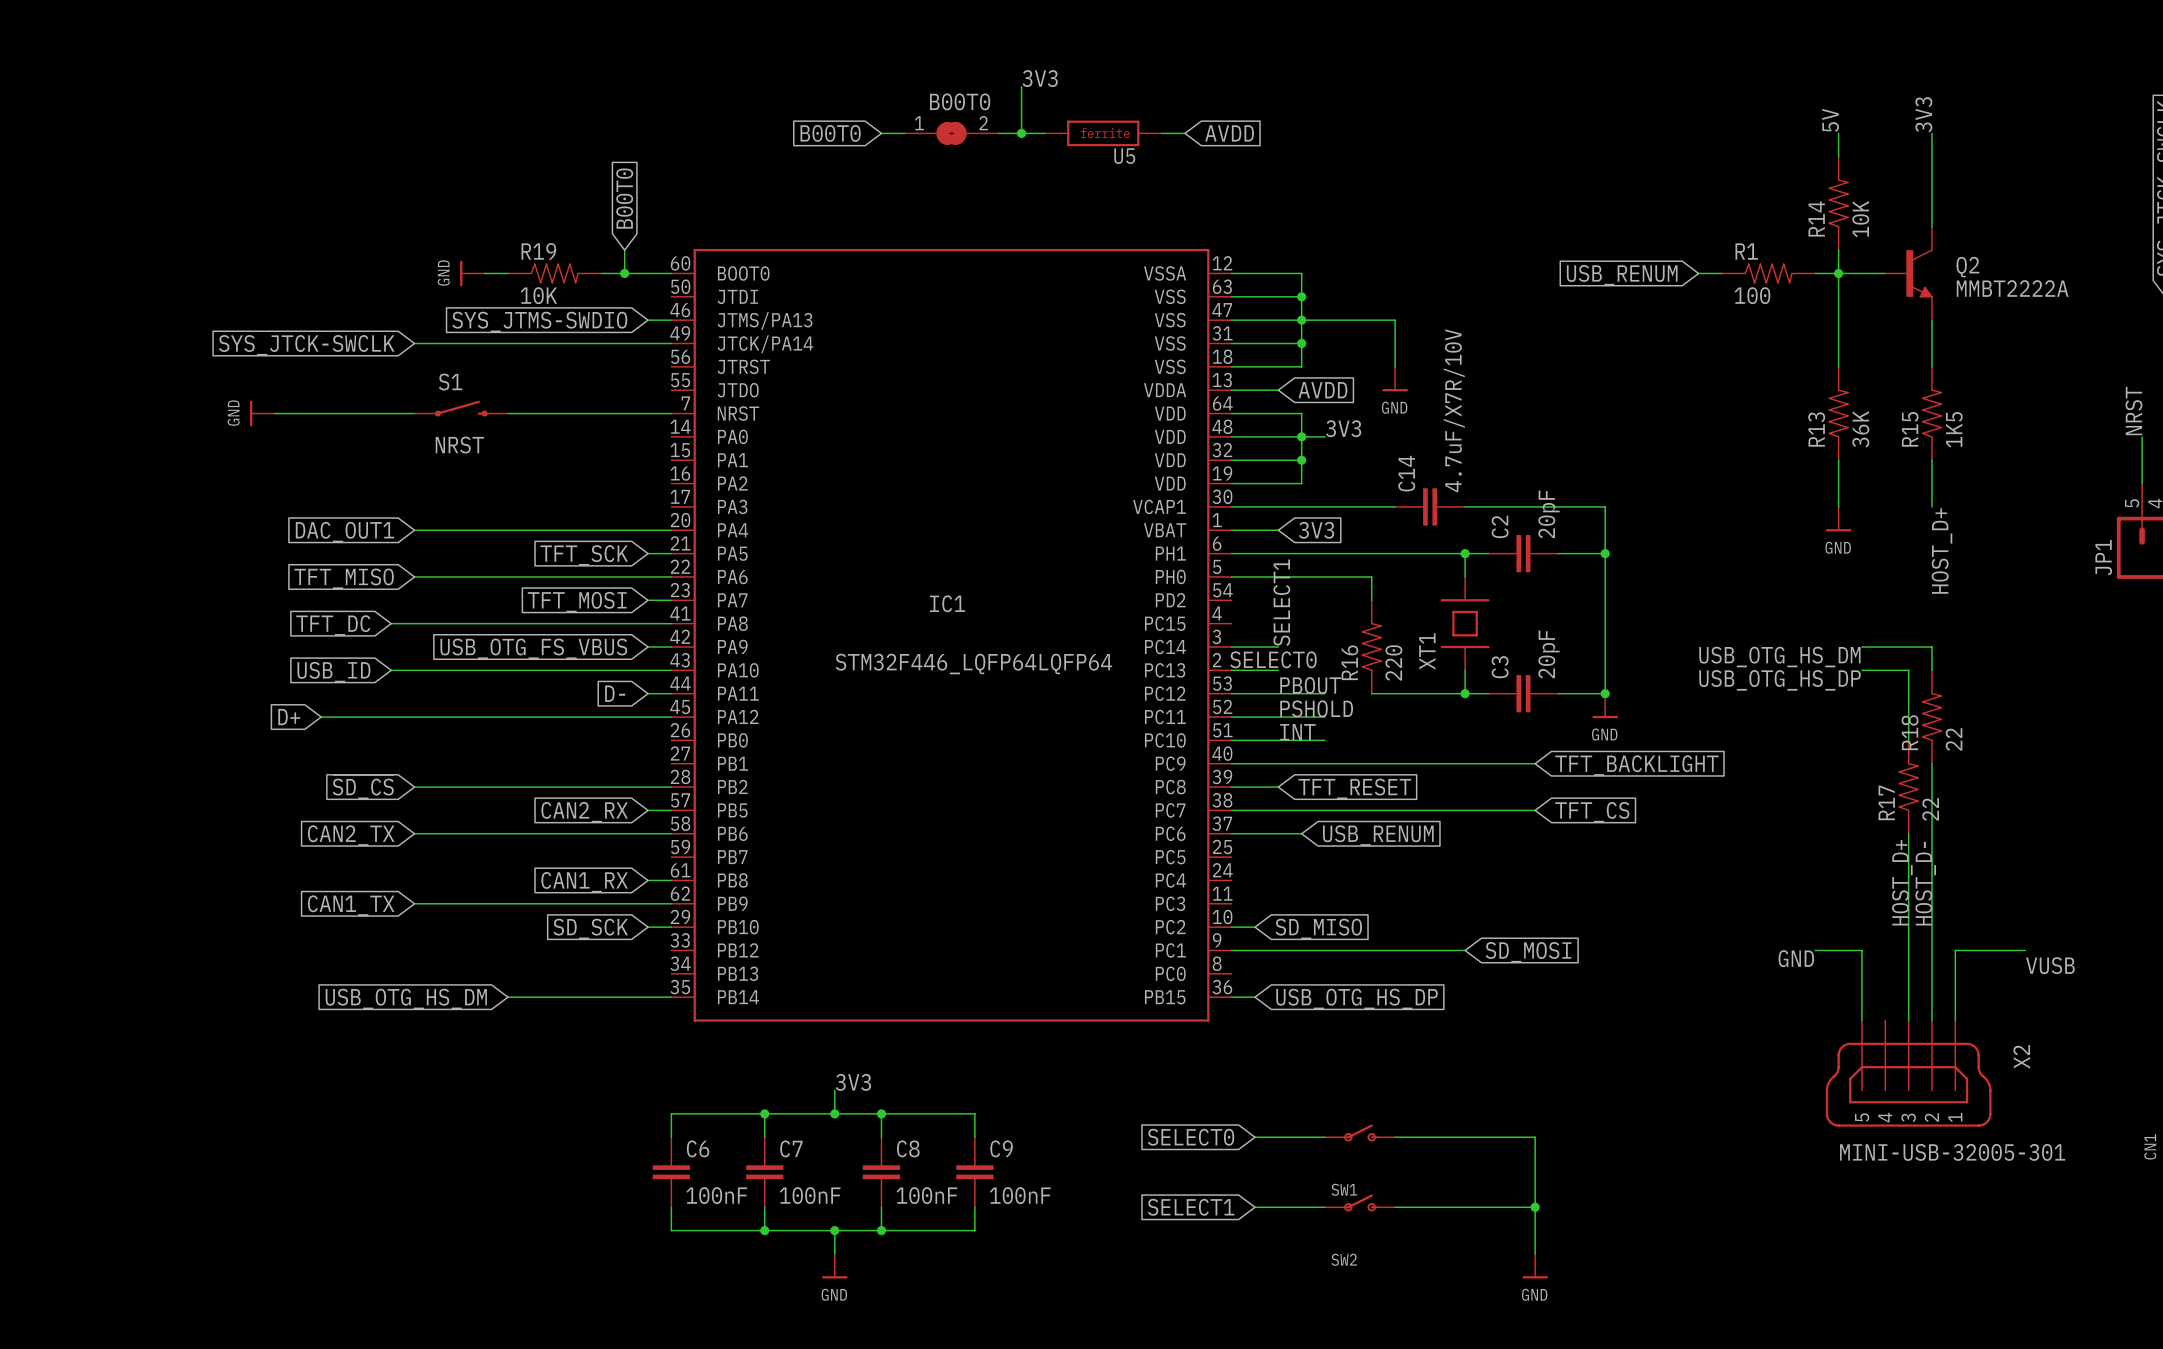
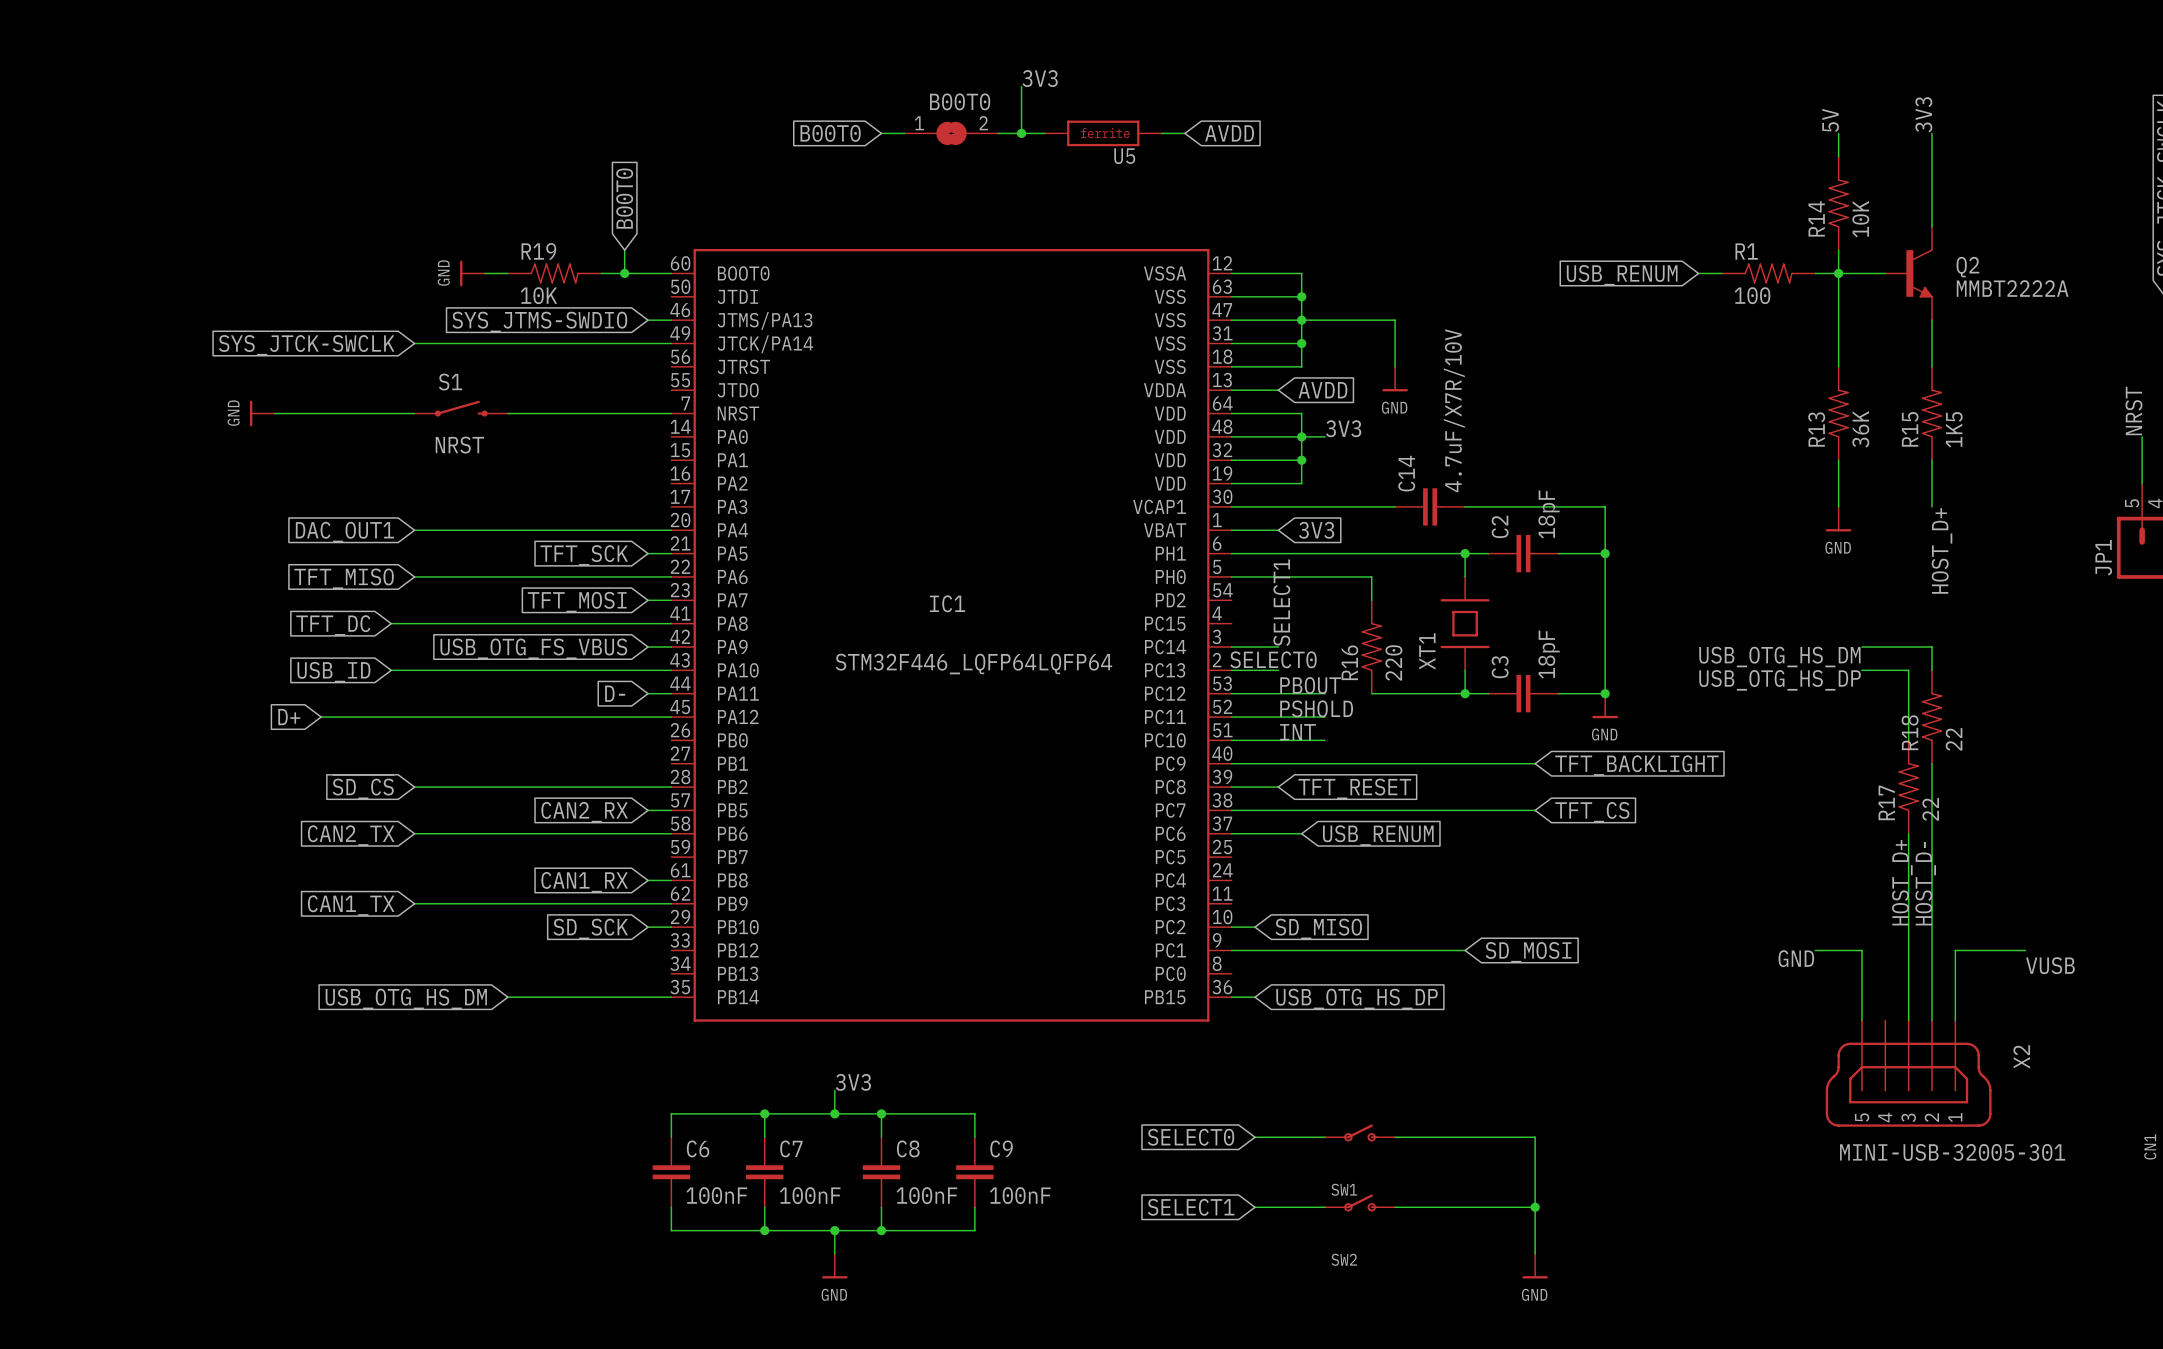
C2 value: 20pF (1549, 514) -> 18pF (1549, 514)
C3 value: 20pF (1549, 654) -> 18pF (1549, 654)

